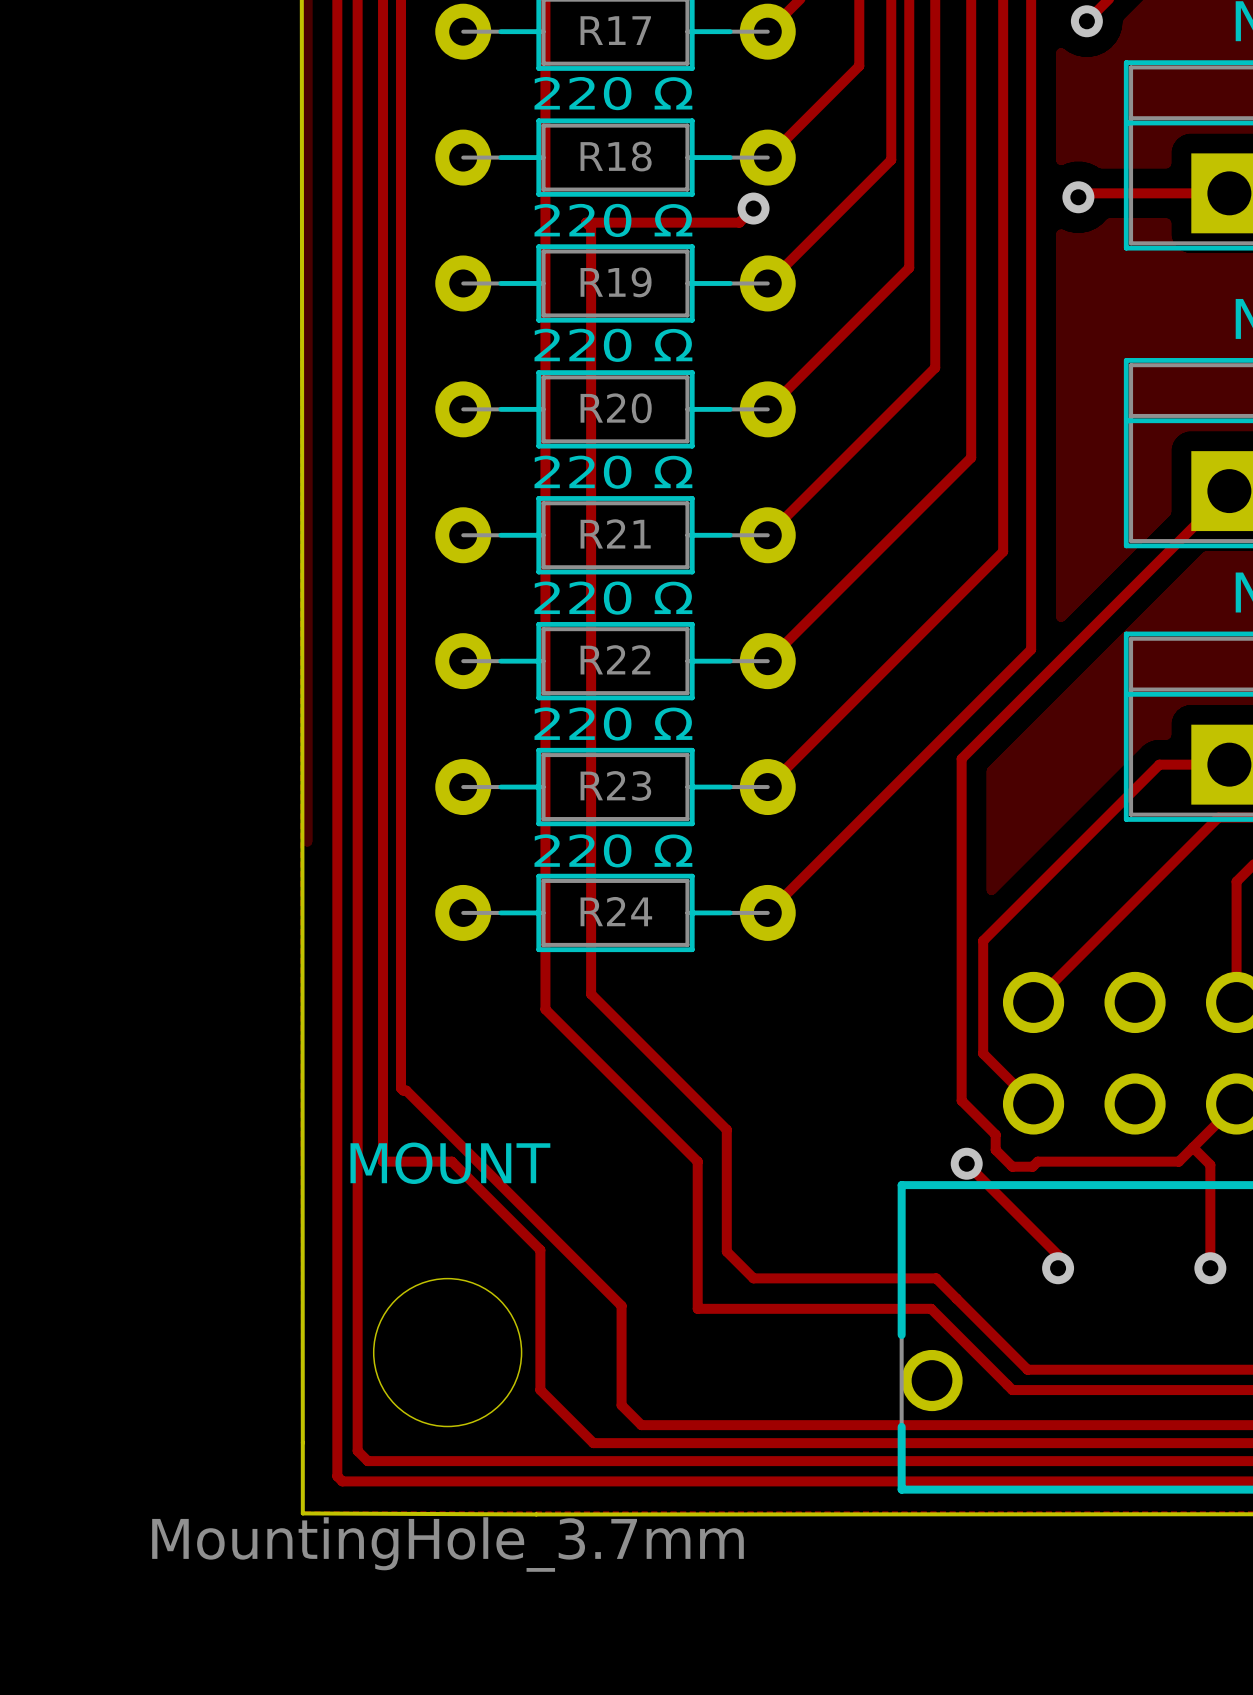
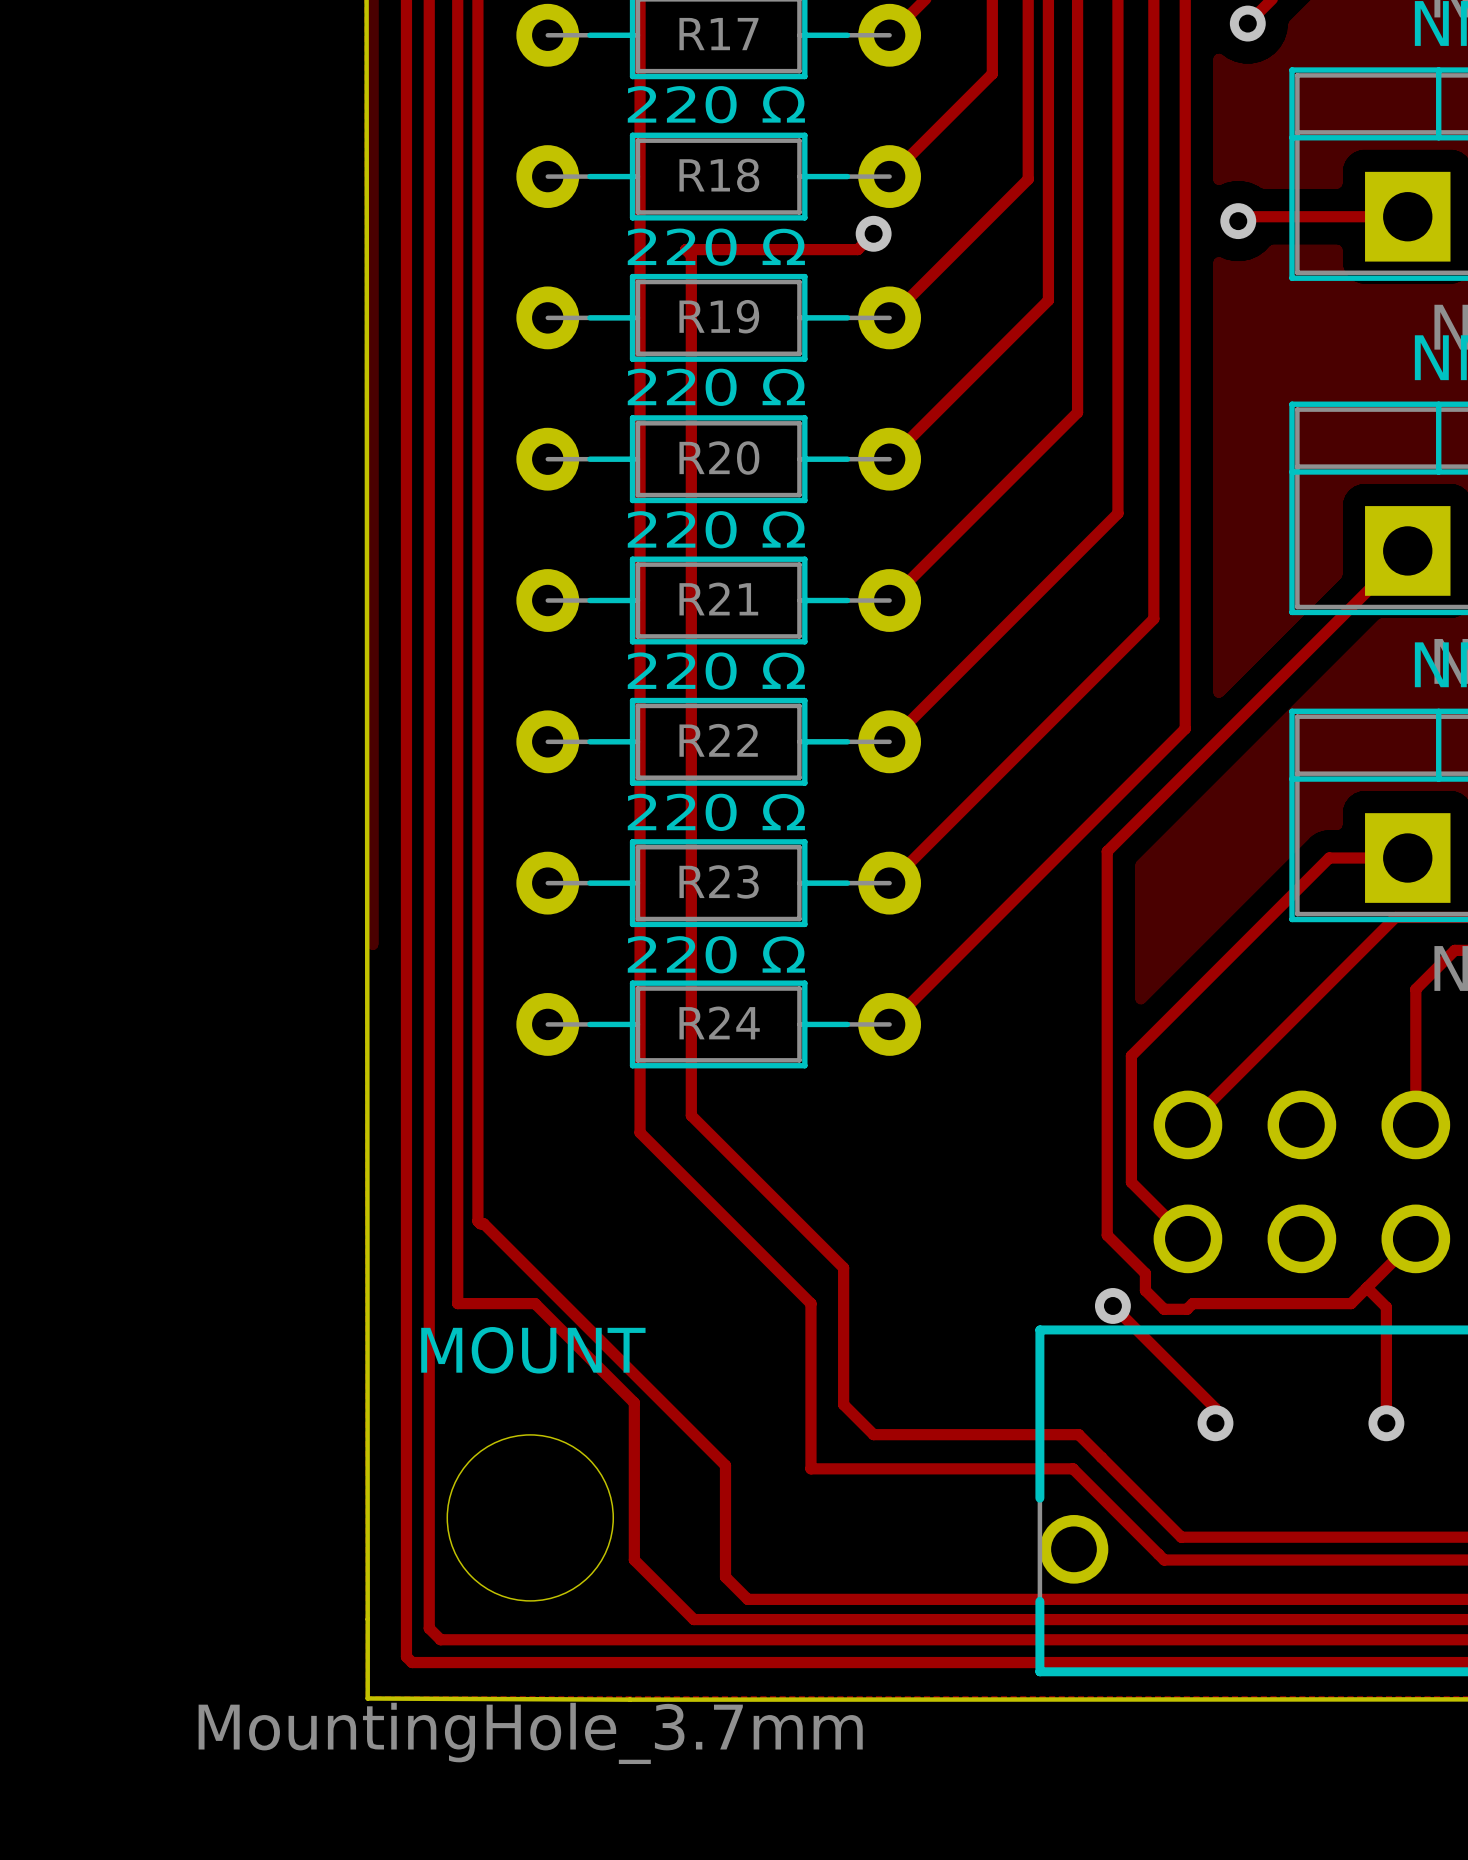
MOUNT name position: MOUNT (450, 1163) -> MOUNT (533, 1350)

